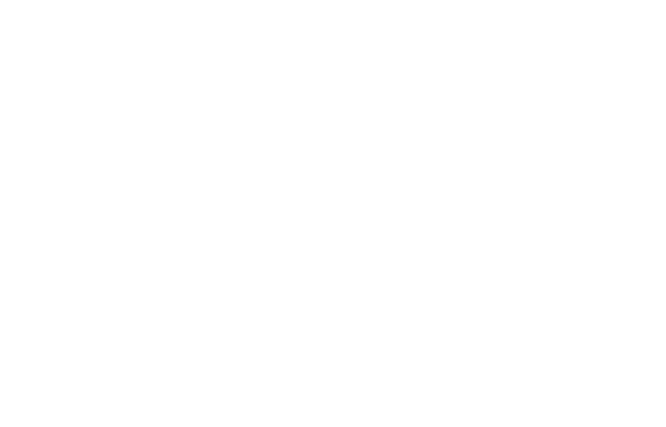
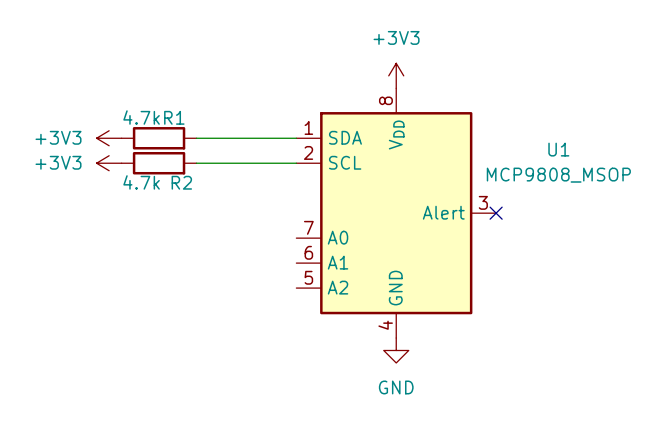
power symbol: none -> +3V3 (396, 75)
power symbol: none -> +3V3 (109, 138)
R1: none -> 4.7k (159, 138)
wire: none -> (196, 138) (296, 138)
power symbol: none -> +3V3 (109, 163)
R2: none -> 4.7k (159, 163)
wire: none -> (196, 163) (296, 163)
U1: none -> MCP9808_MSOP (396, 213)
no-connect mark: none -> (496, 213)
power symbol: none -> GND (396, 350)

